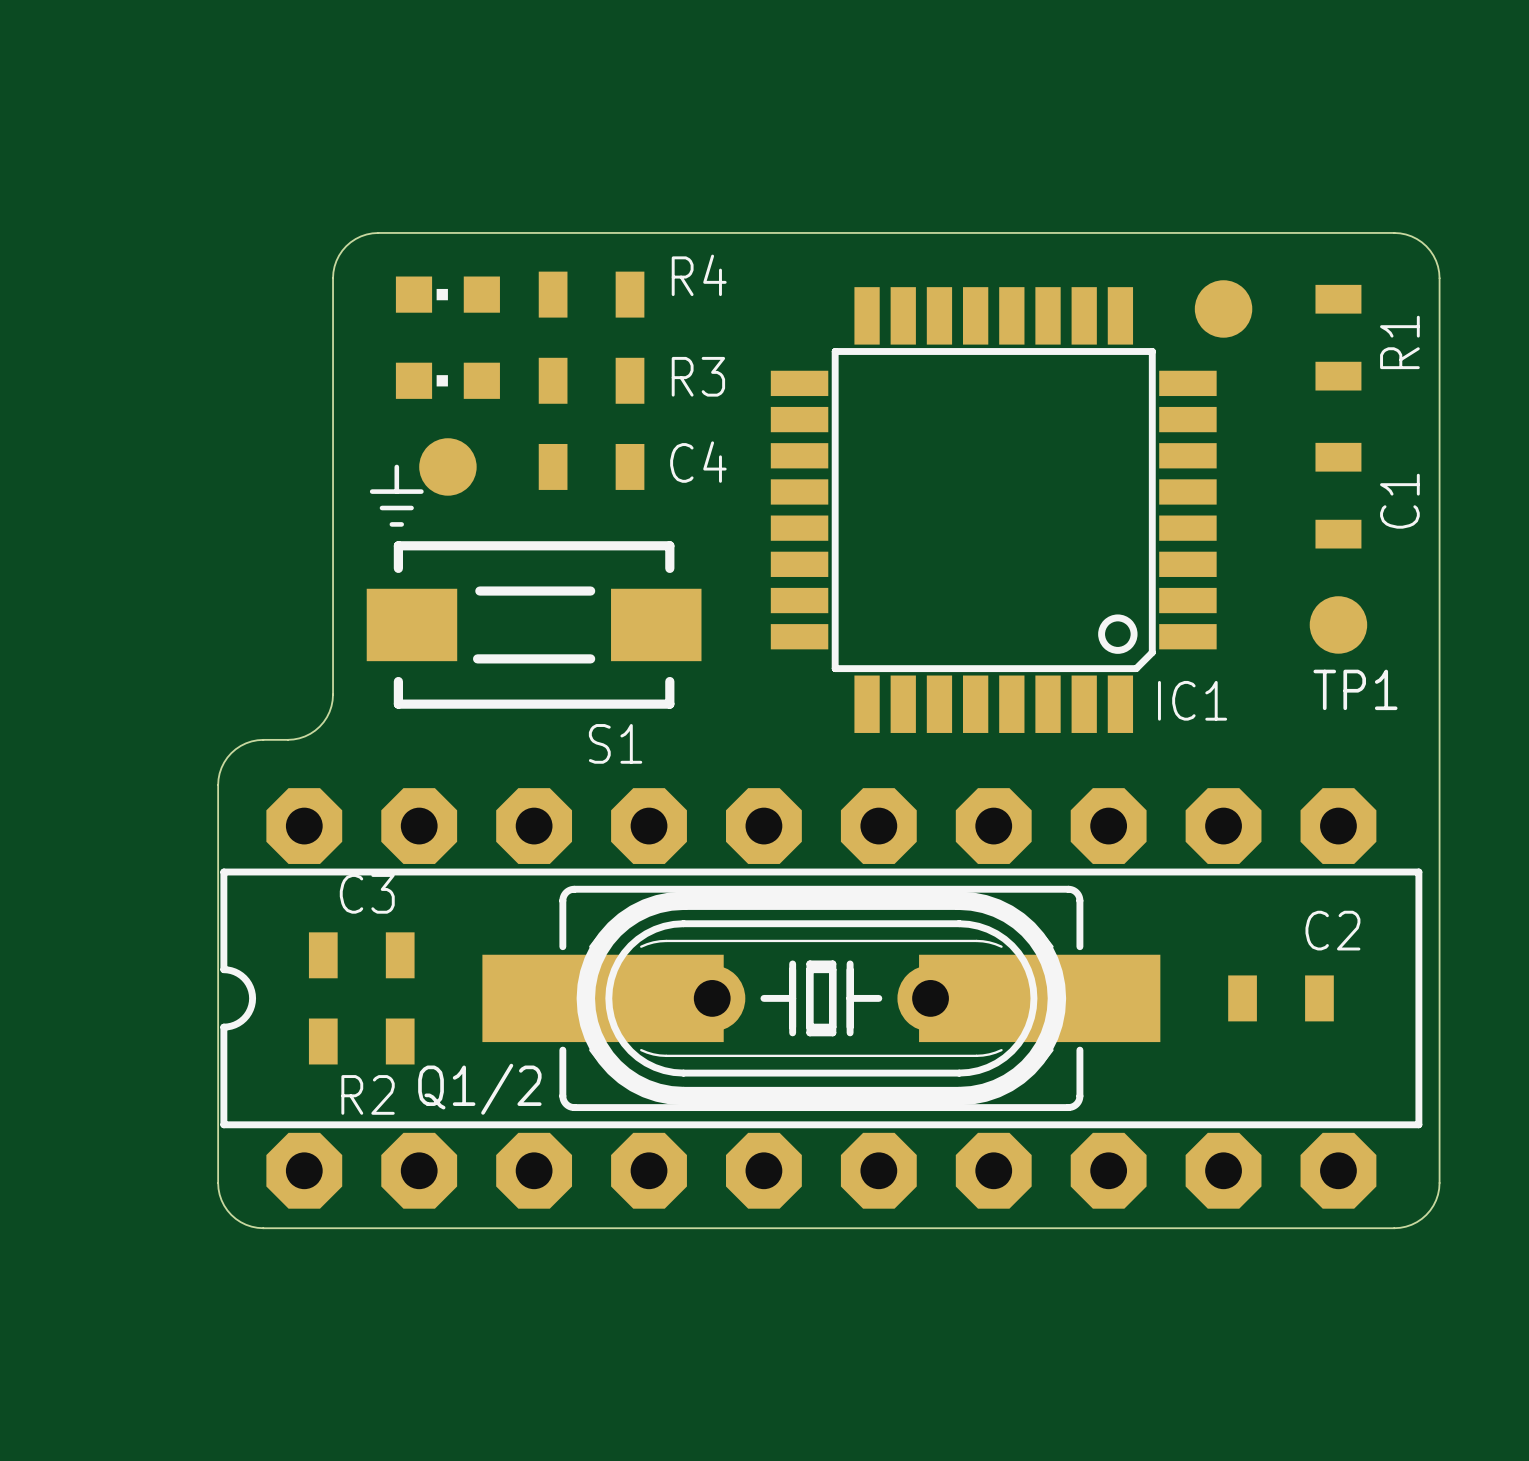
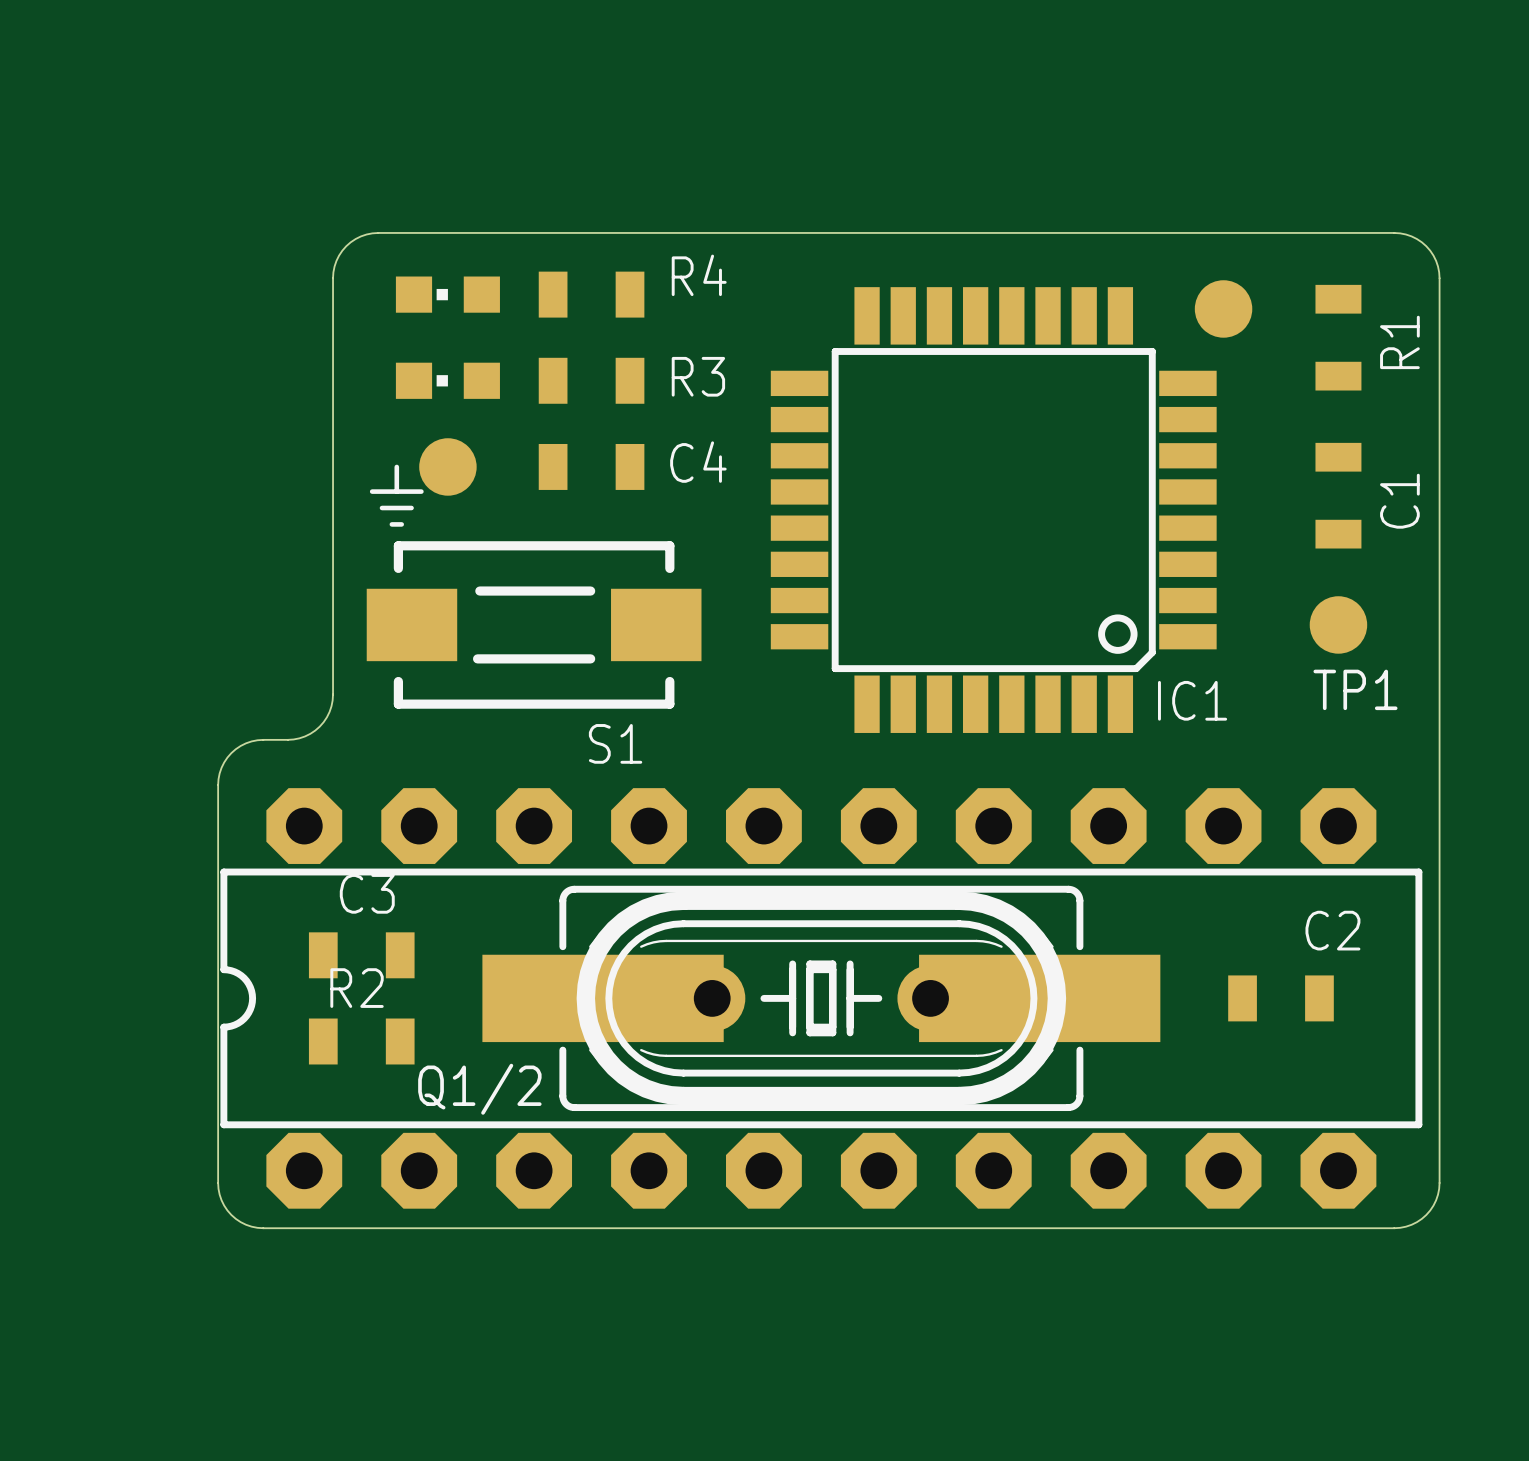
R2 name position: R2 (368, 1094) -> R2 (357, 988)

